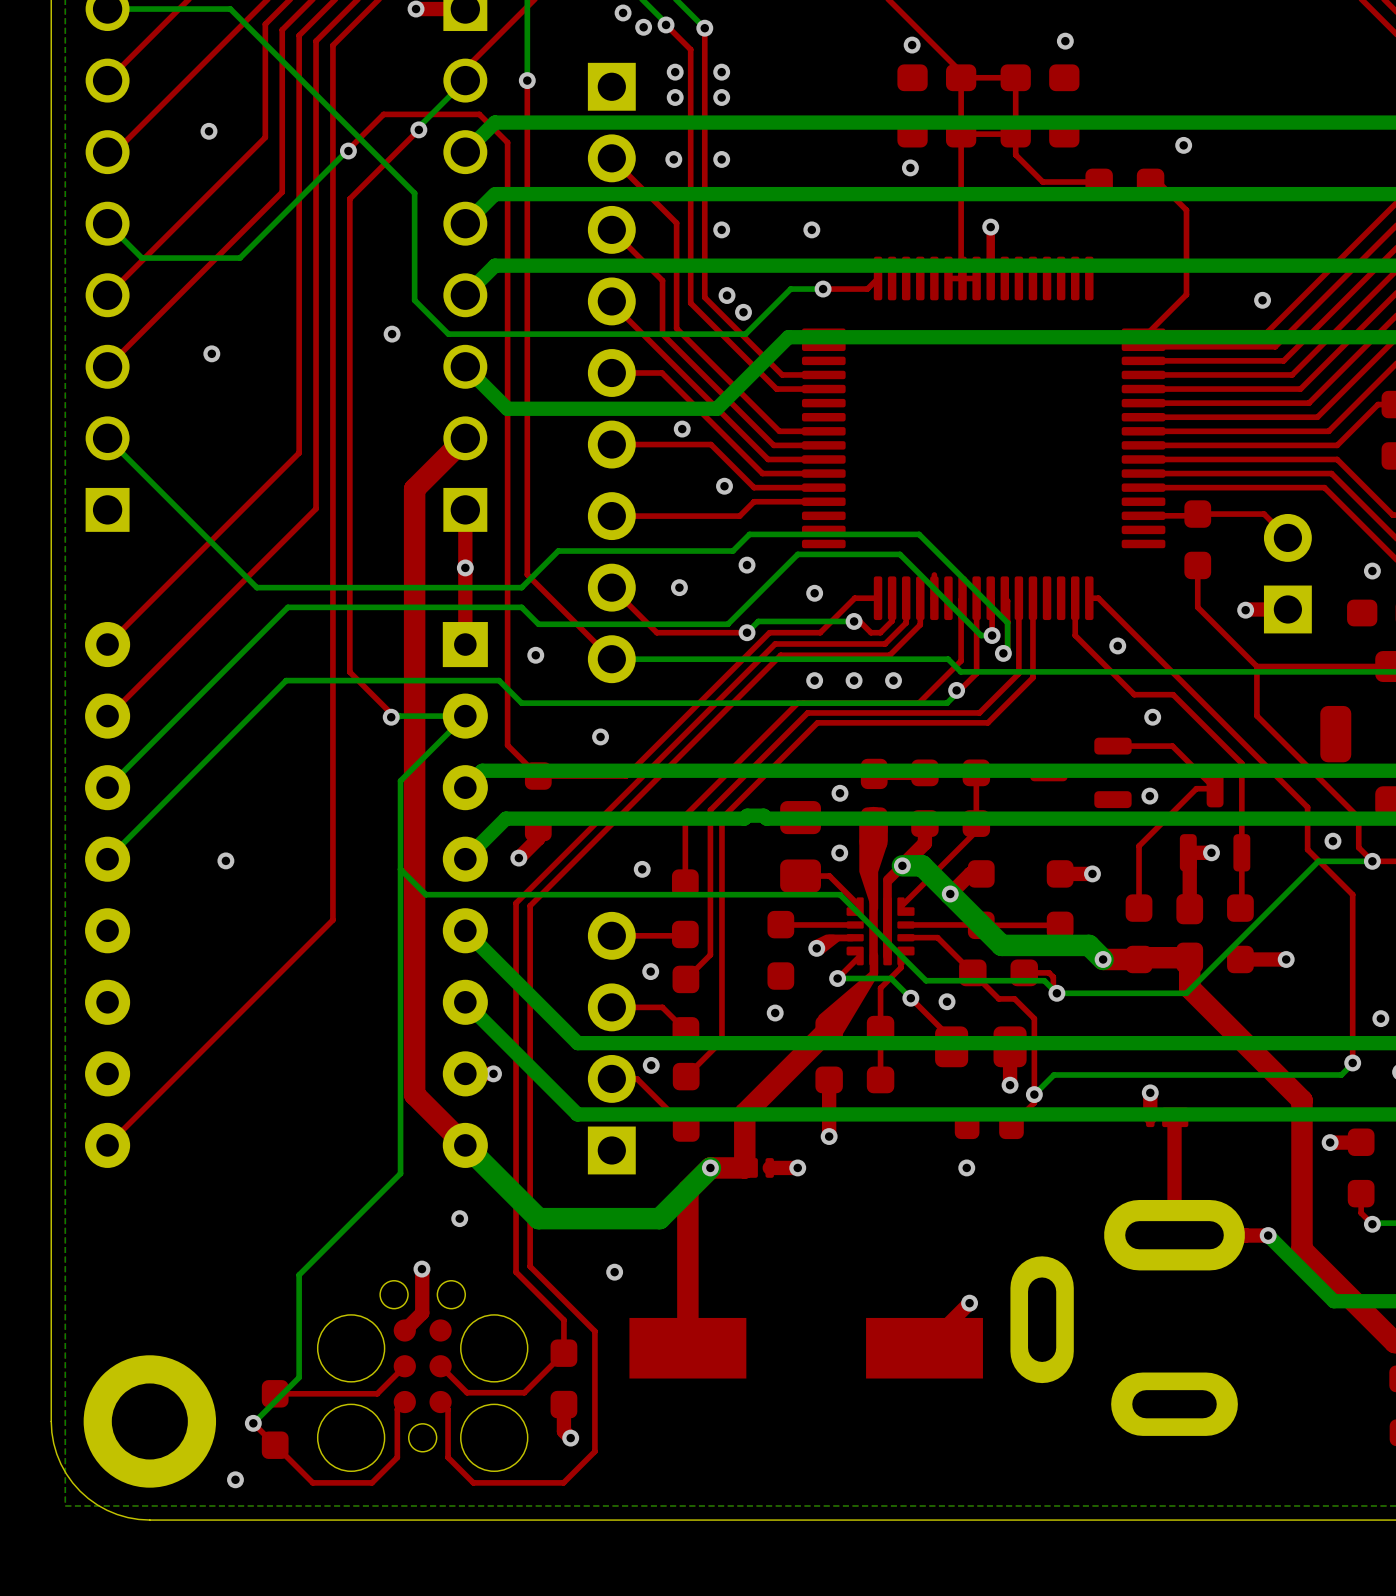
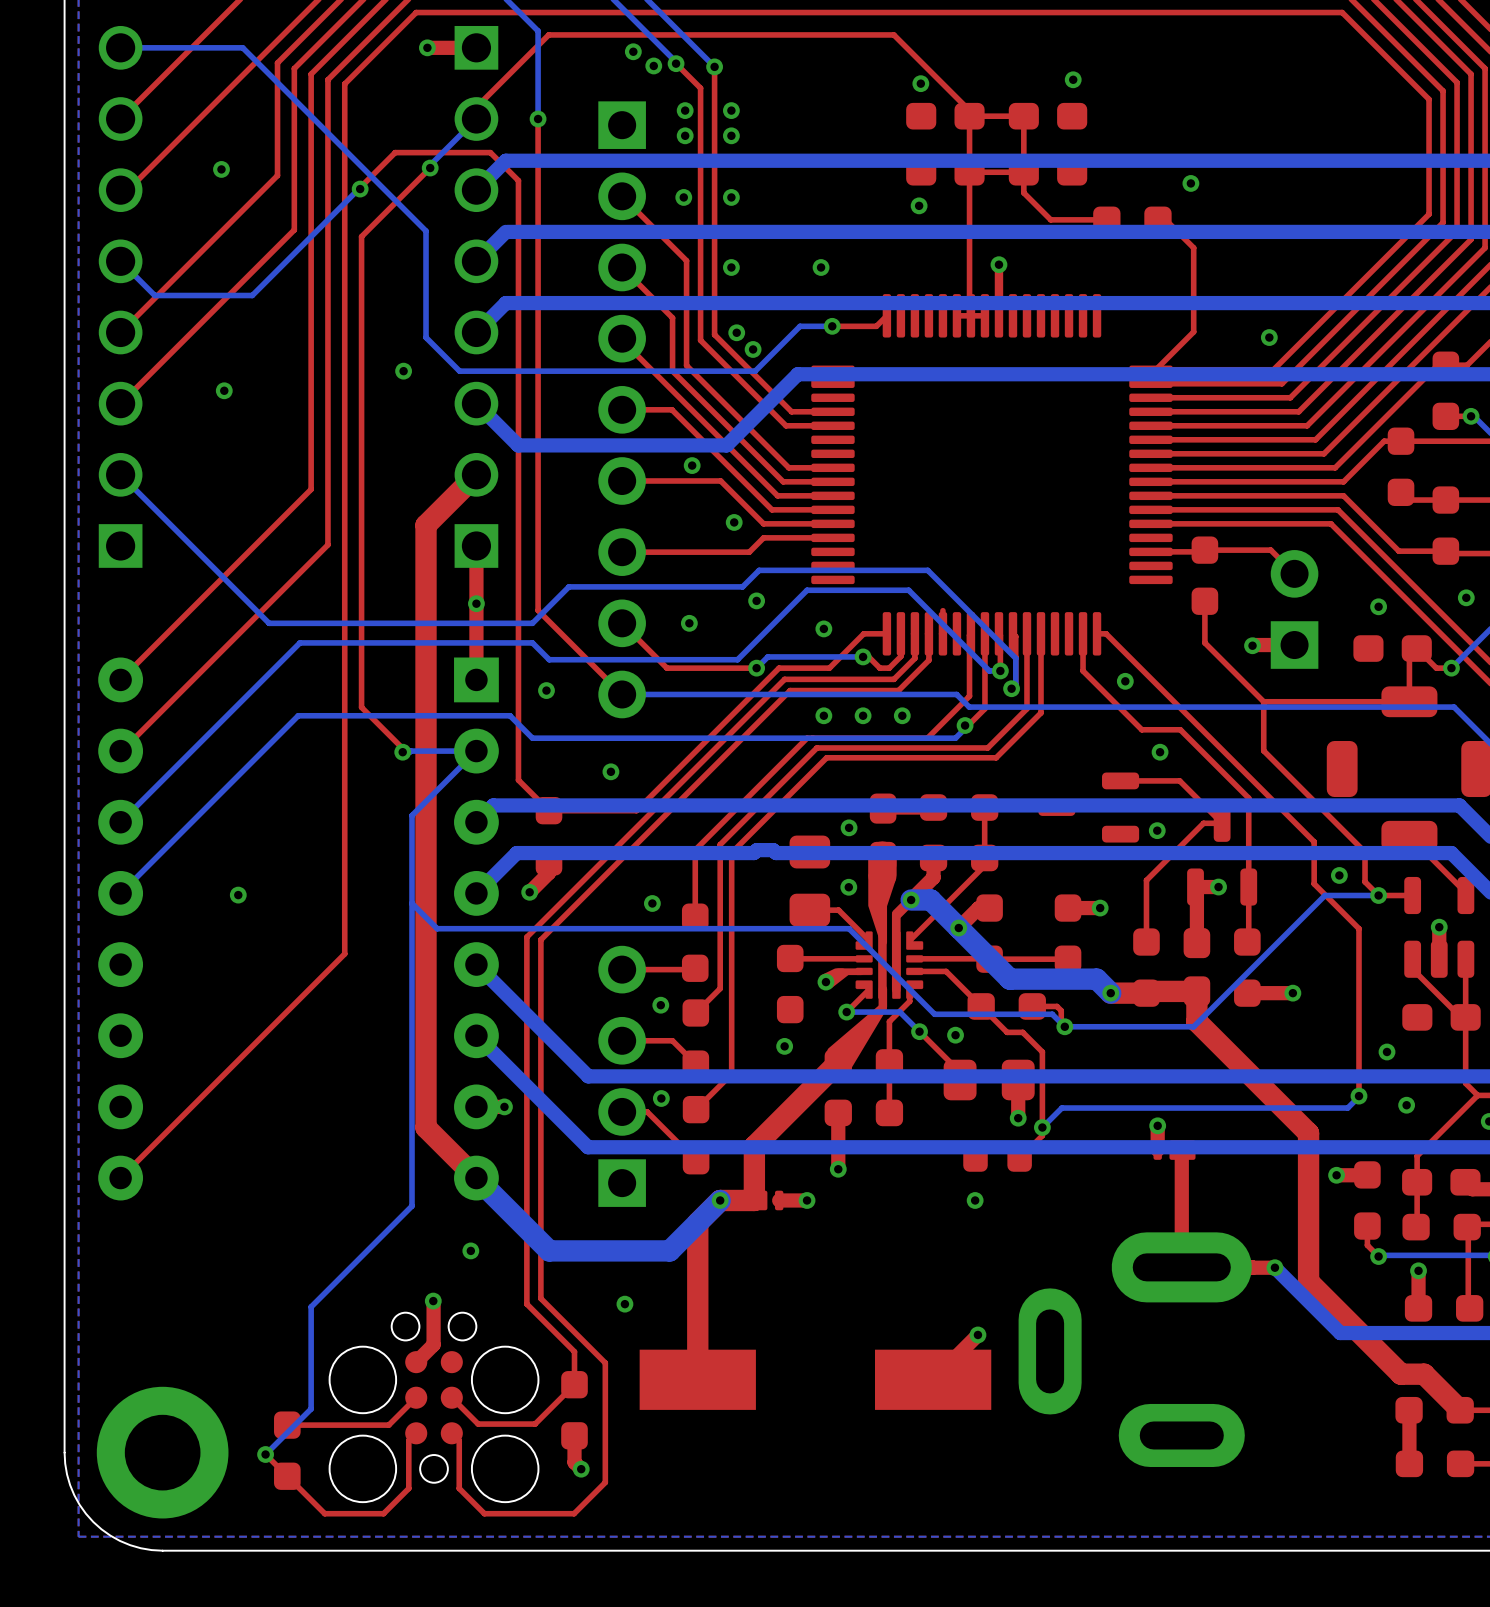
via: (235, 1479) -> none

